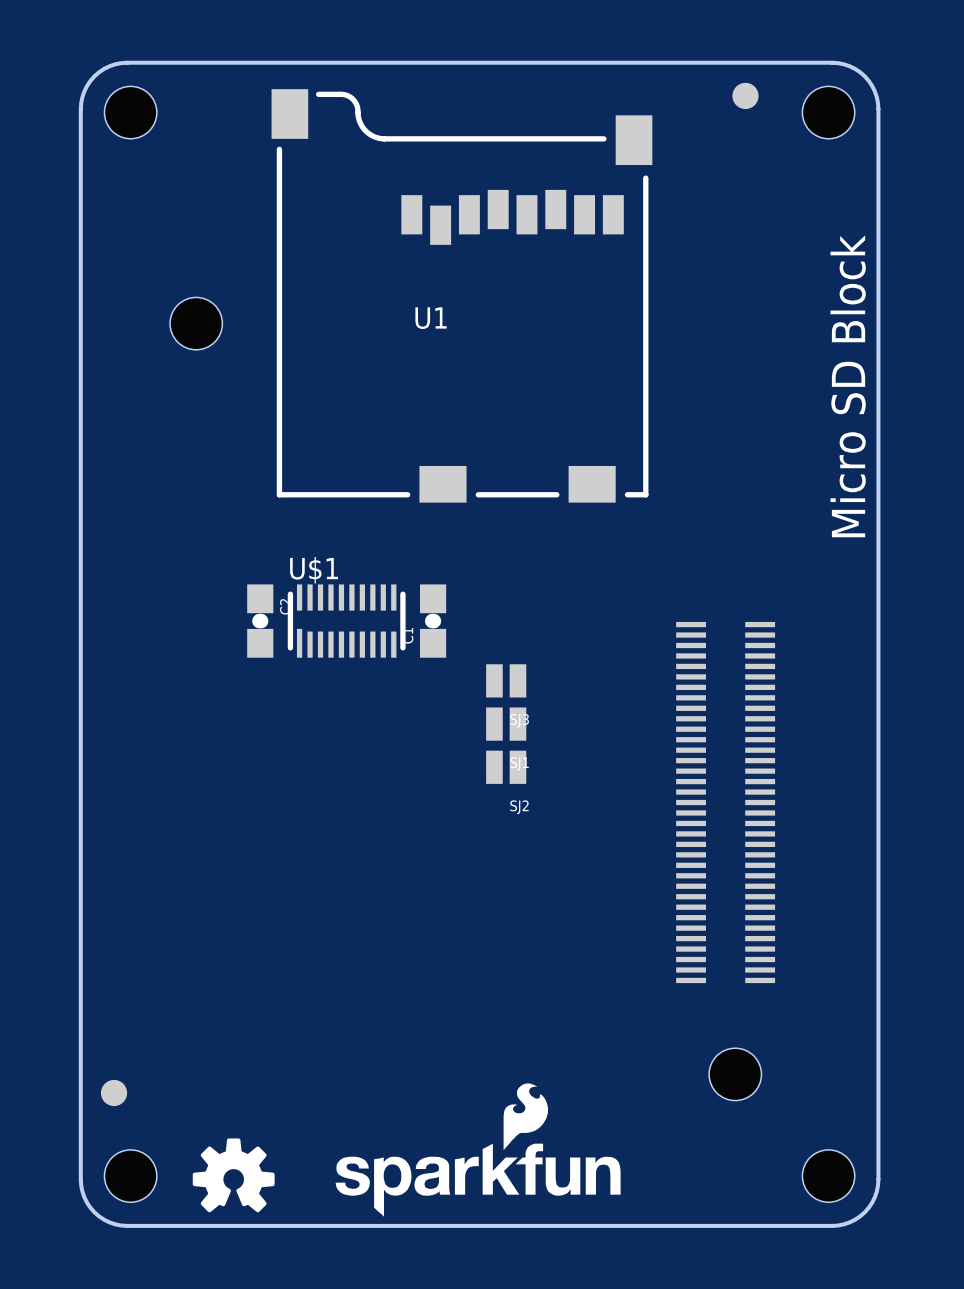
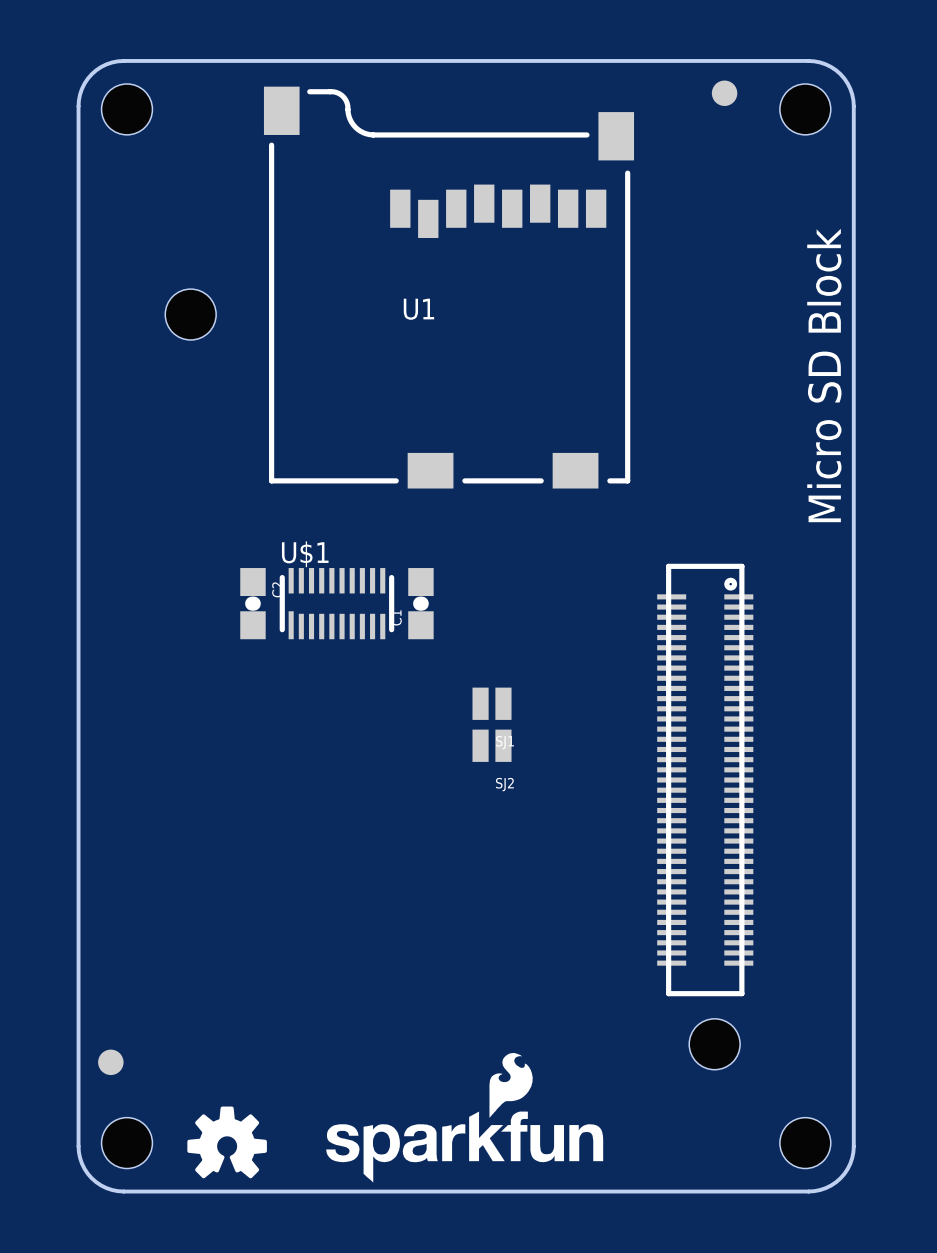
part footprint: [676, 621, 776, 984] -> [657, 563, 754, 997]
part: (506, 680) -> none

